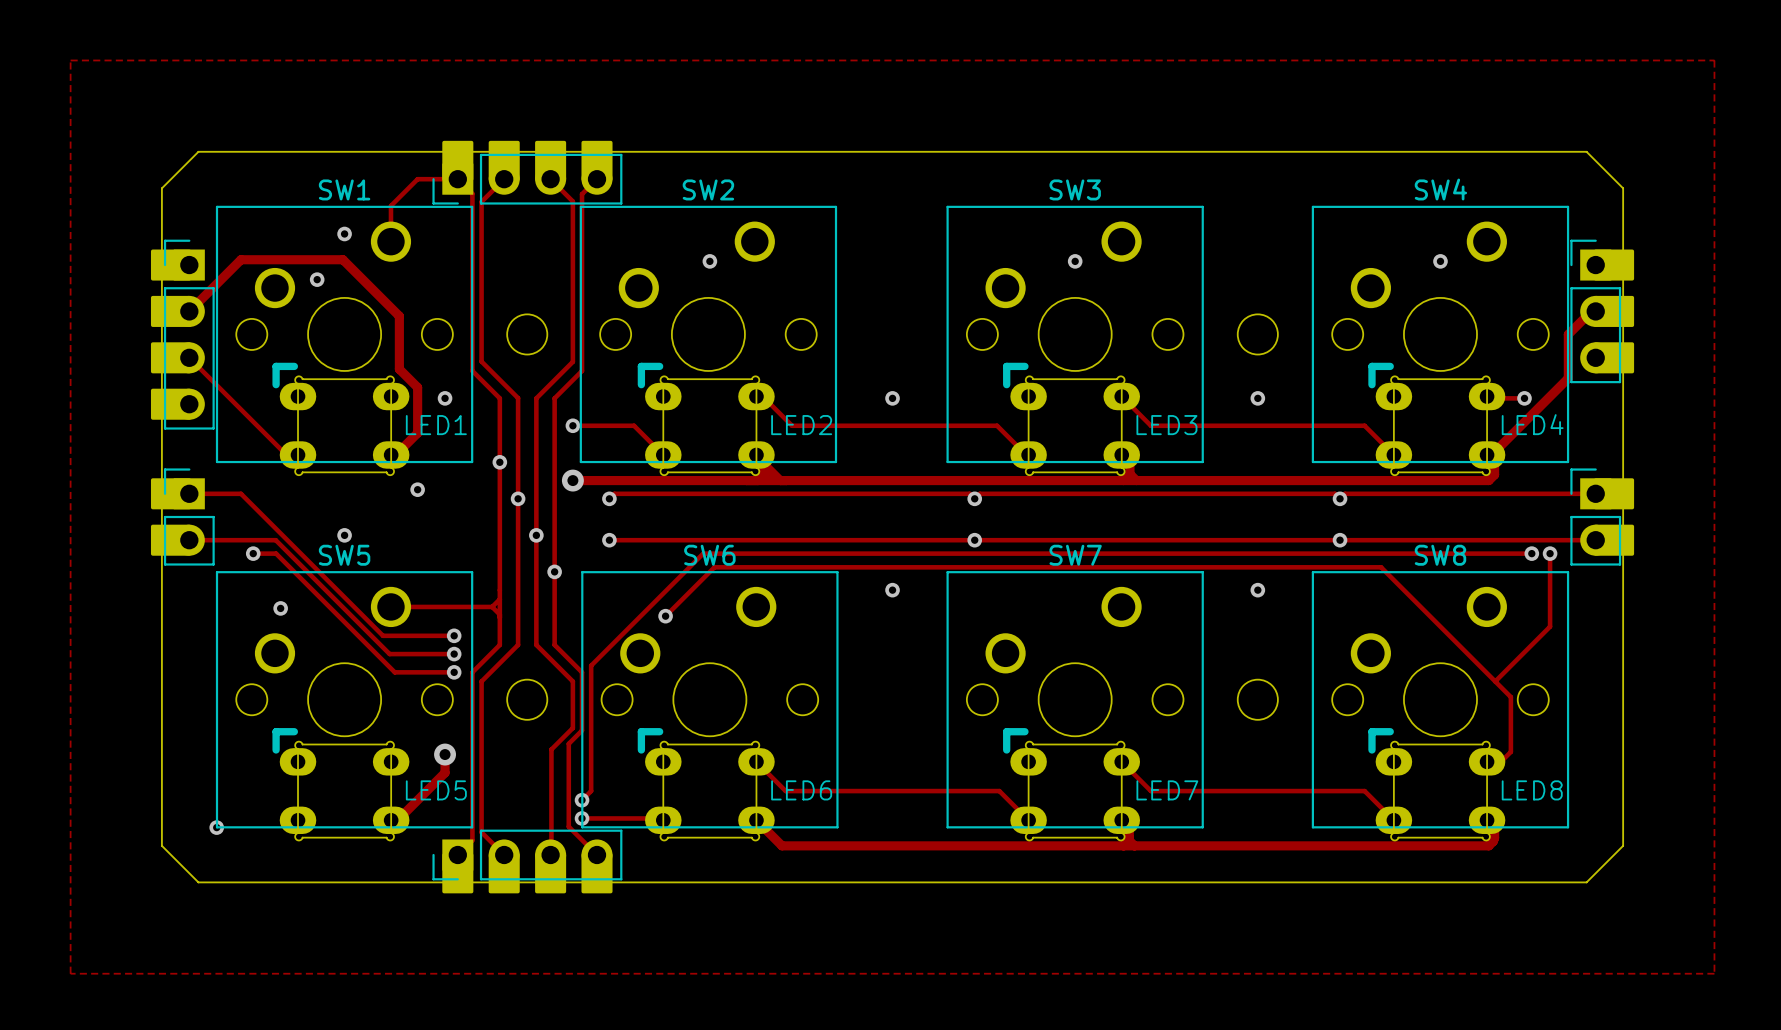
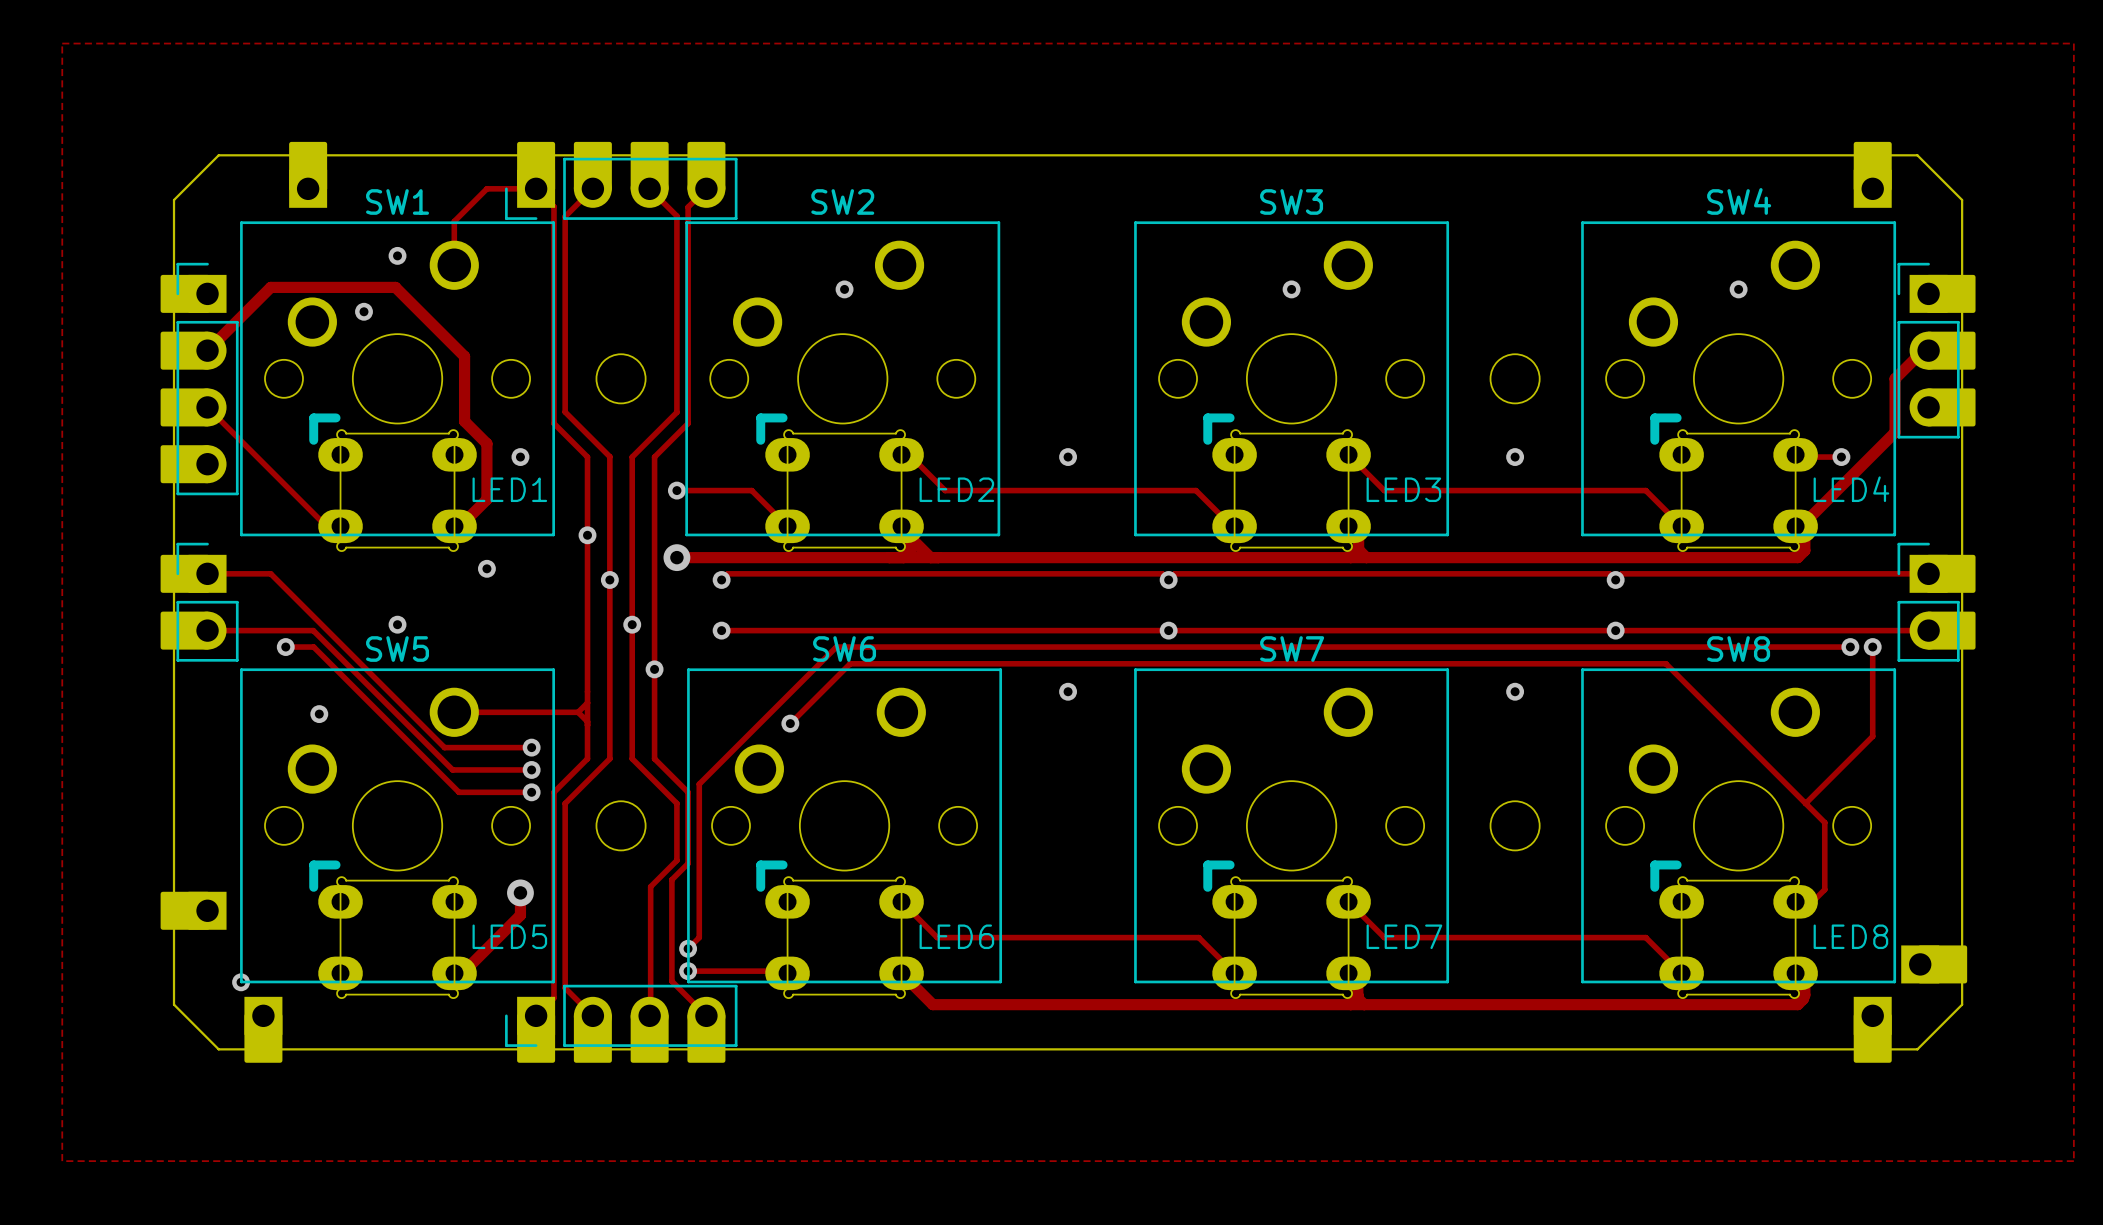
part: none -> (308, 174)
part: none -> (1872, 174)
part: none -> (193, 910)
part: none -> (1934, 964)
part: none -> (263, 1029)
part: none -> (1872, 1029)

